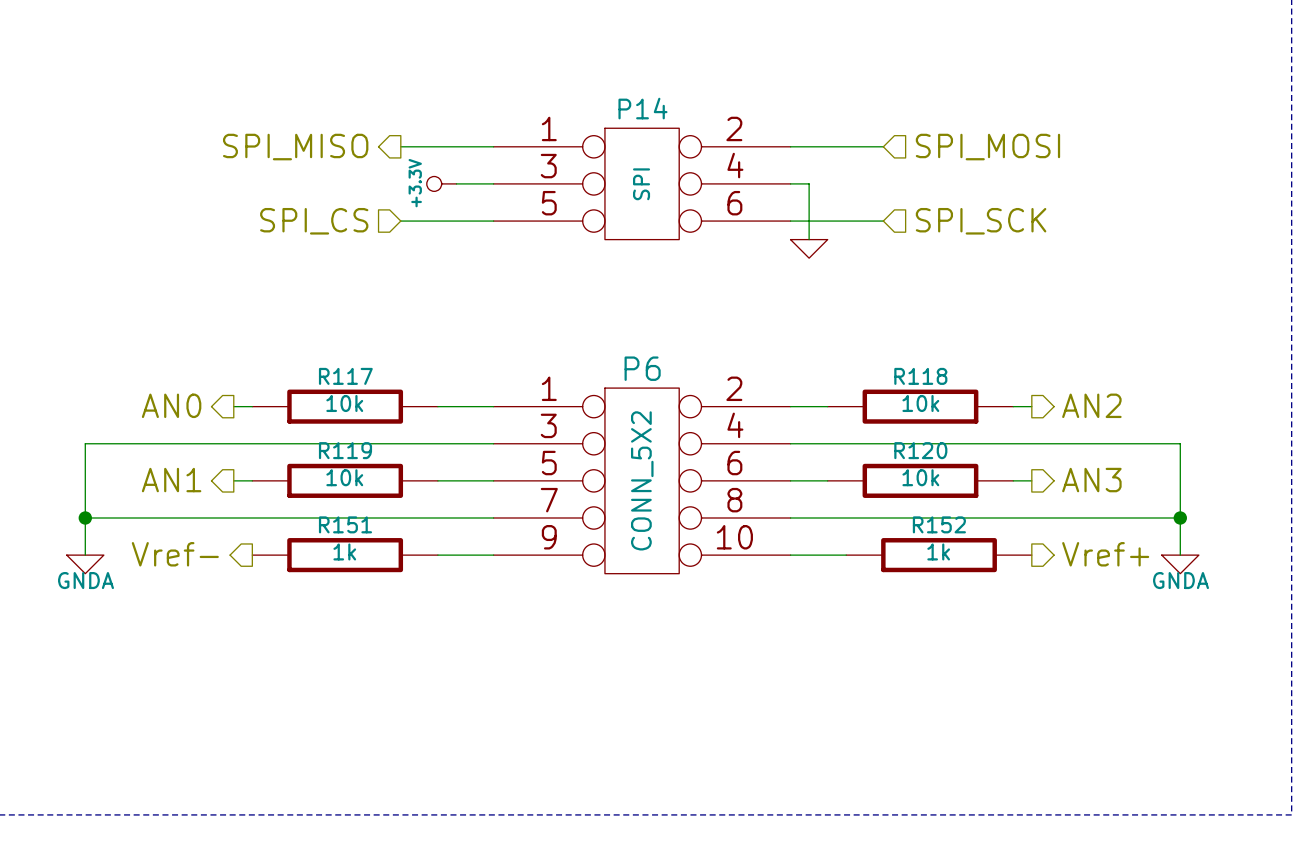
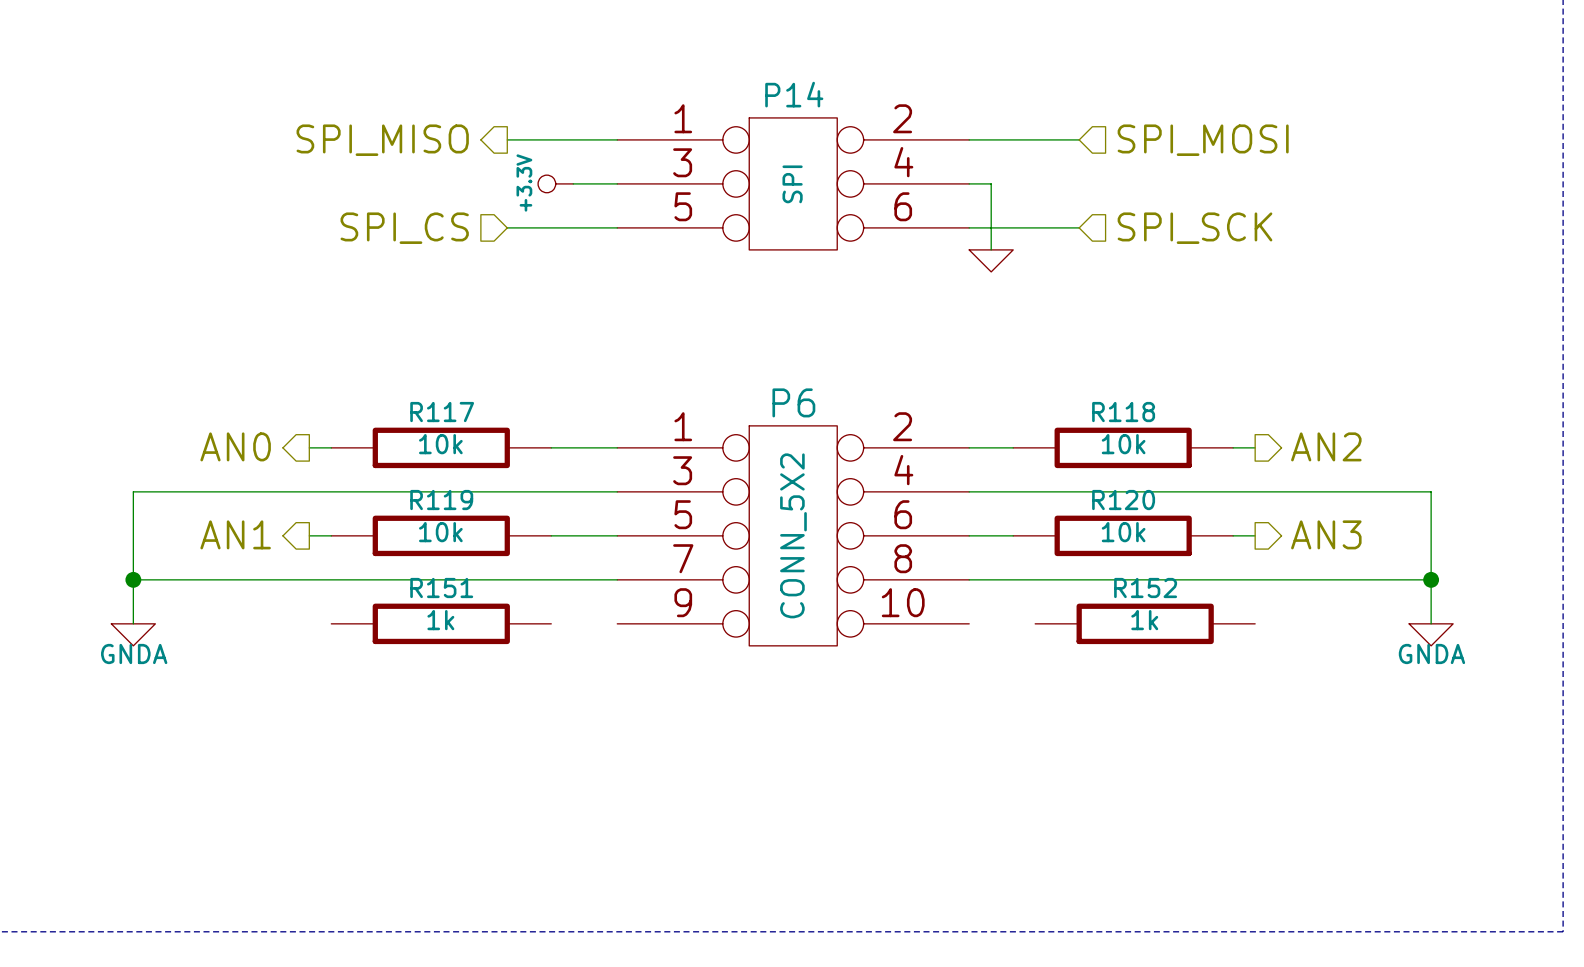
hierarchical label: Vref- (175, 554) -> none
hierarchical label: Vref+ (1105, 554) -> none
wire: (437, 555) (493, 555) -> none
wire: (790, 555) (846, 555) -> none

